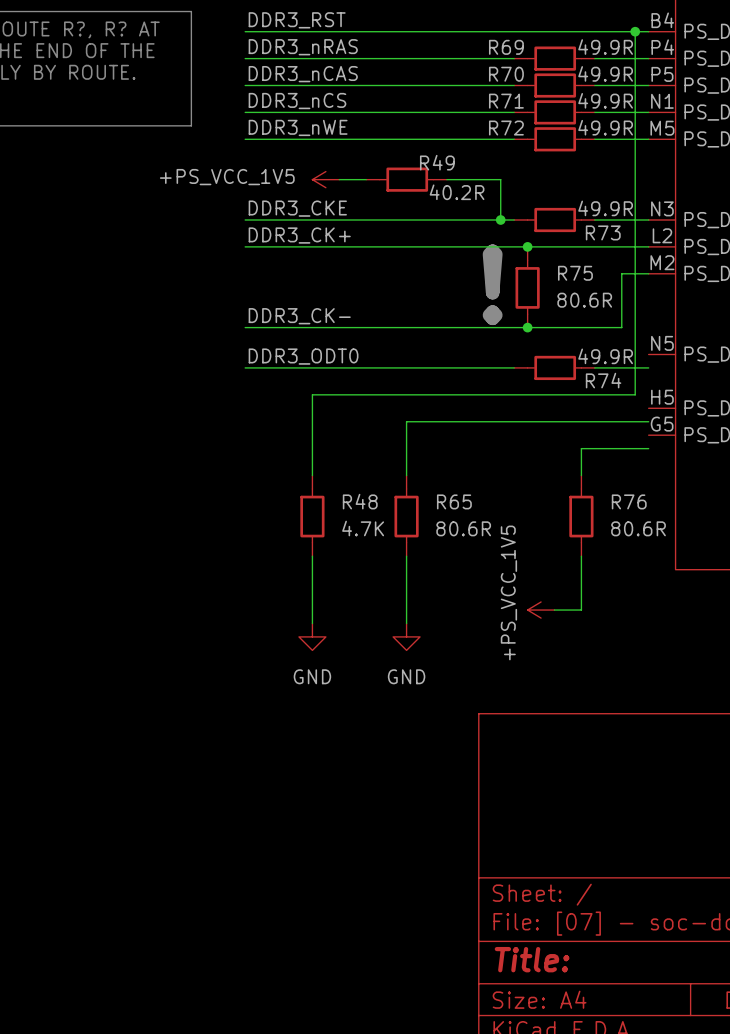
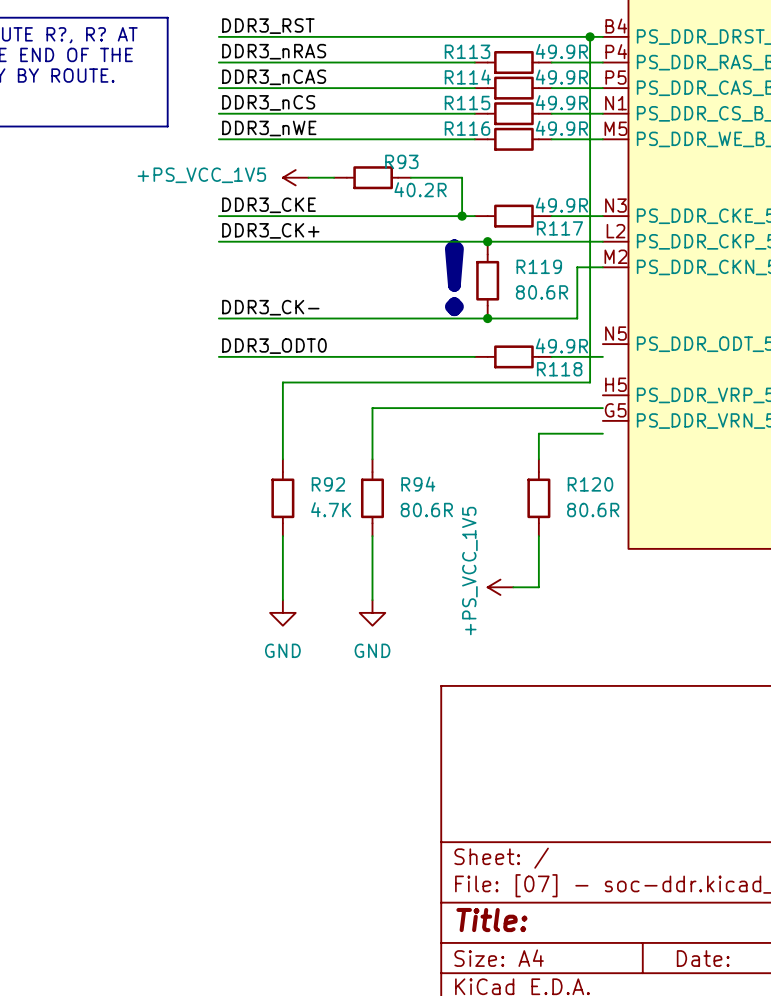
R69 name: R69 (506, 47) -> R113 (467, 51)
R70 name: R70 (506, 74) -> R114 (467, 77)
R71 name: R71 (506, 101) -> R115 (467, 102)
R72 name: R72 (506, 128) -> R116 (467, 128)
R49 name: R49 (437, 162) -> R93 (401, 161)
R73 name: R73 (603, 232) -> R117 (559, 228)
R75 name: R75 (575, 273) -> R119 (539, 266)
R74 name: R74 (603, 380) -> R118 (559, 369)
R48 name: R48 (360, 501) -> R92 (328, 484)
R65 name: R65 (454, 501) -> R94 (418, 484)
R76 name: R76 (629, 501) -> R120 (590, 484)

